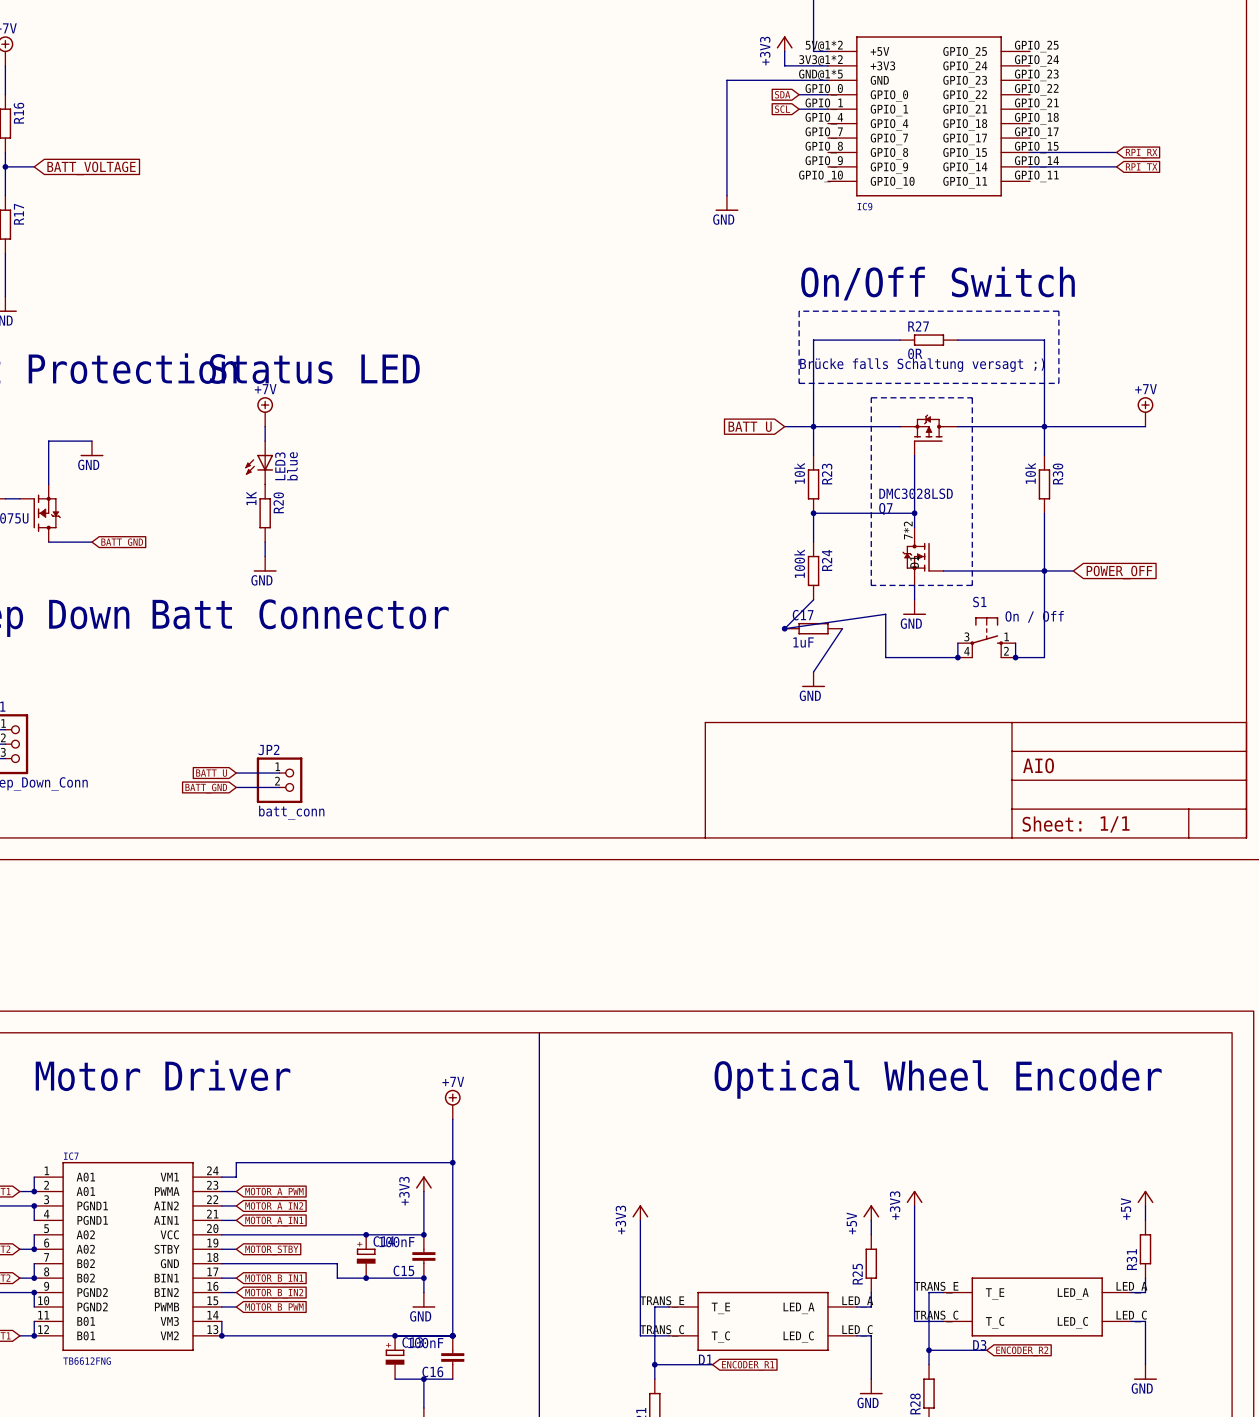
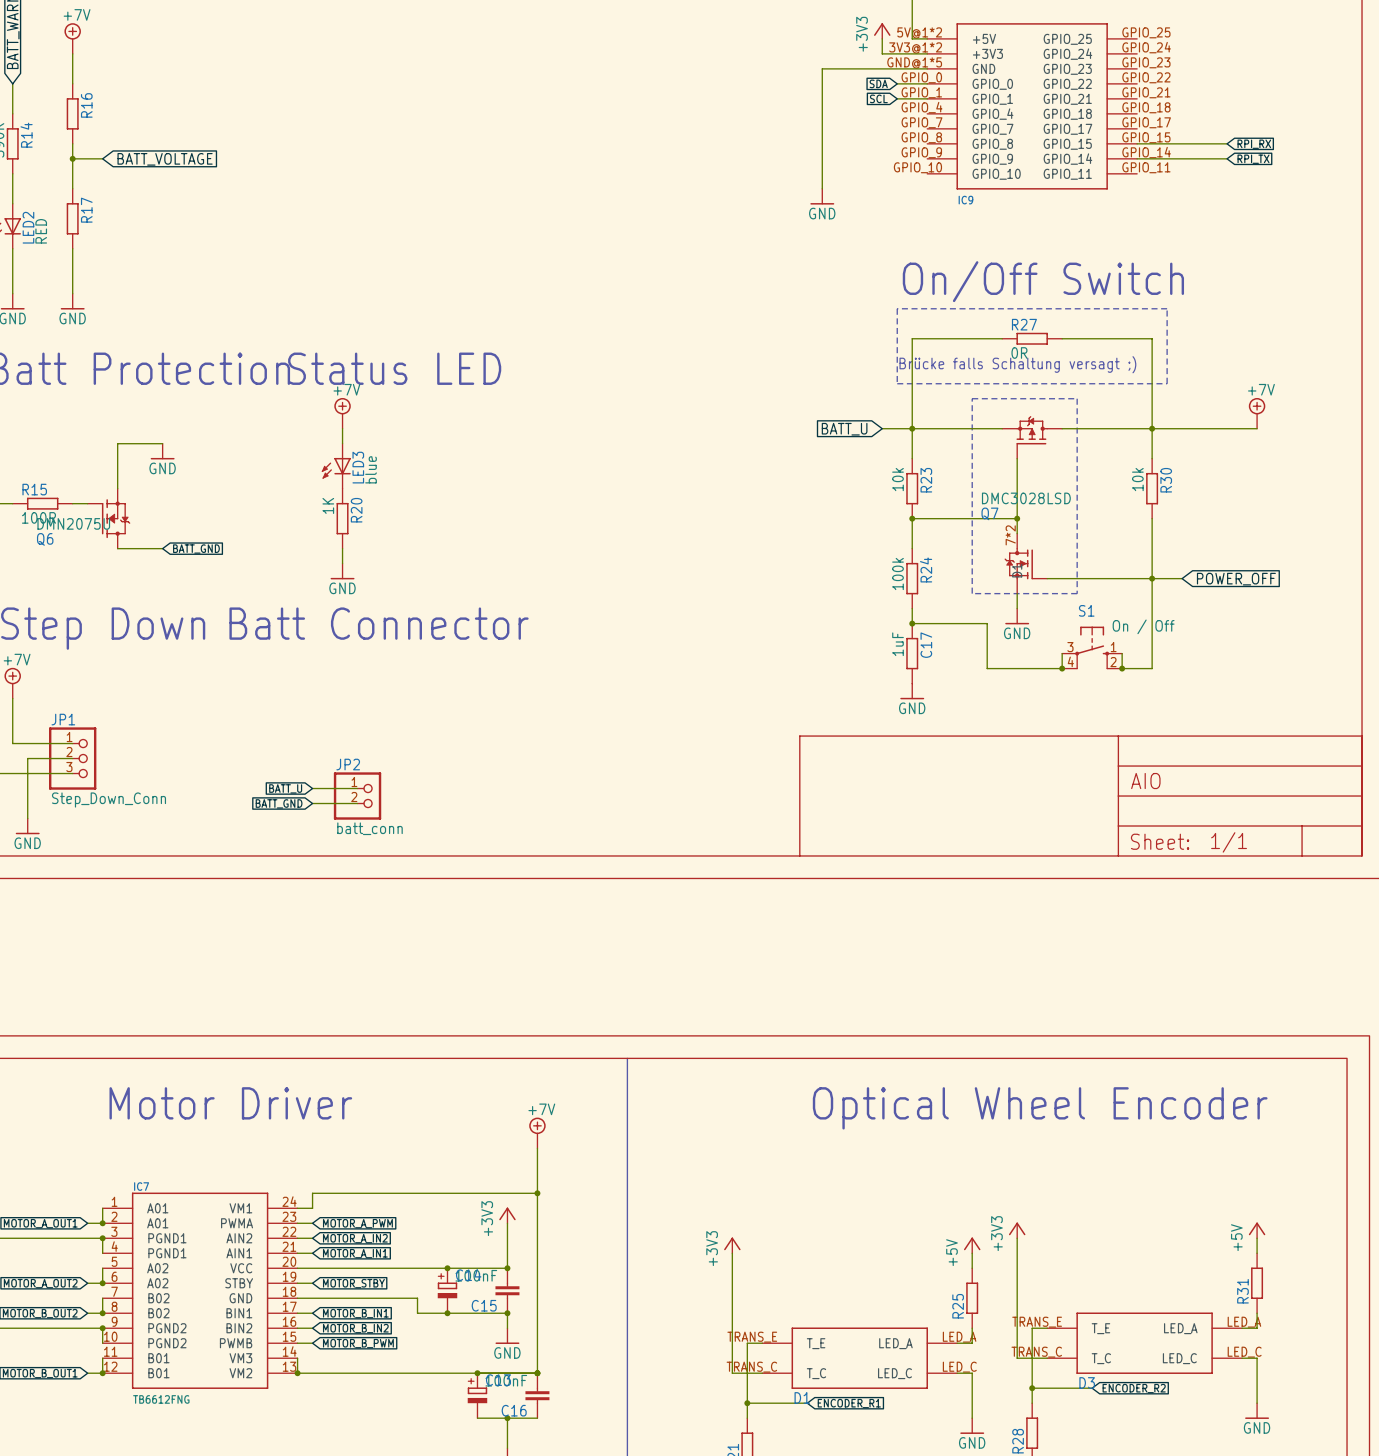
wire: (813, 599) (784, 628) (885, 614) -> (912, 608) (912, 623) (987, 623)
junction position: (784, 628) -> (912, 623)
C17 rotation: 0° (813, 628) -> 90° clockwise (912, 653)
wire: (842, 628) (813, 672) -> none

